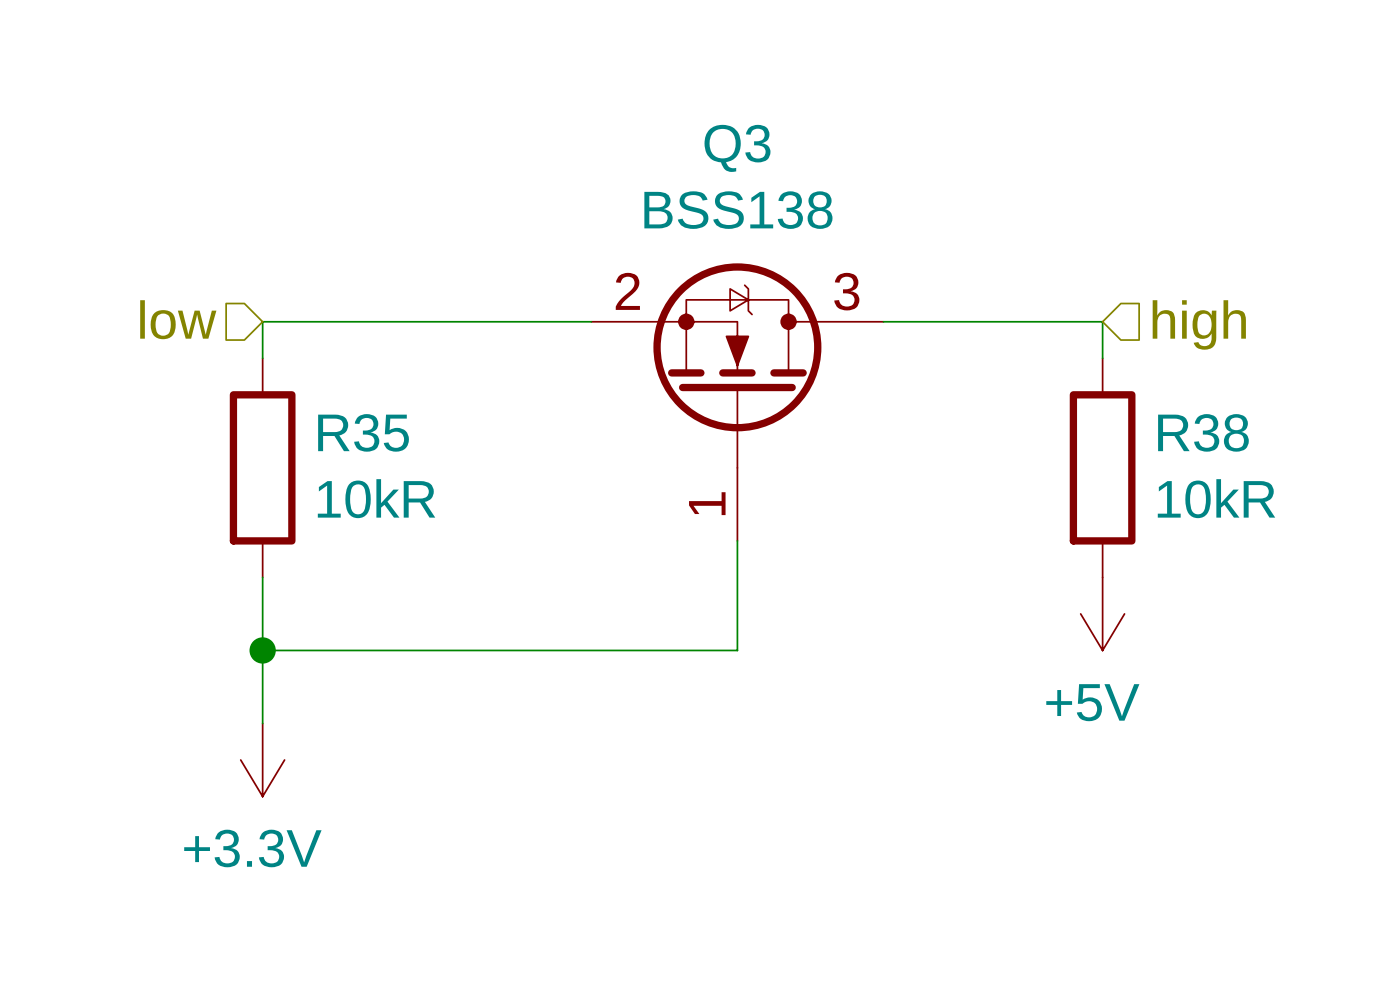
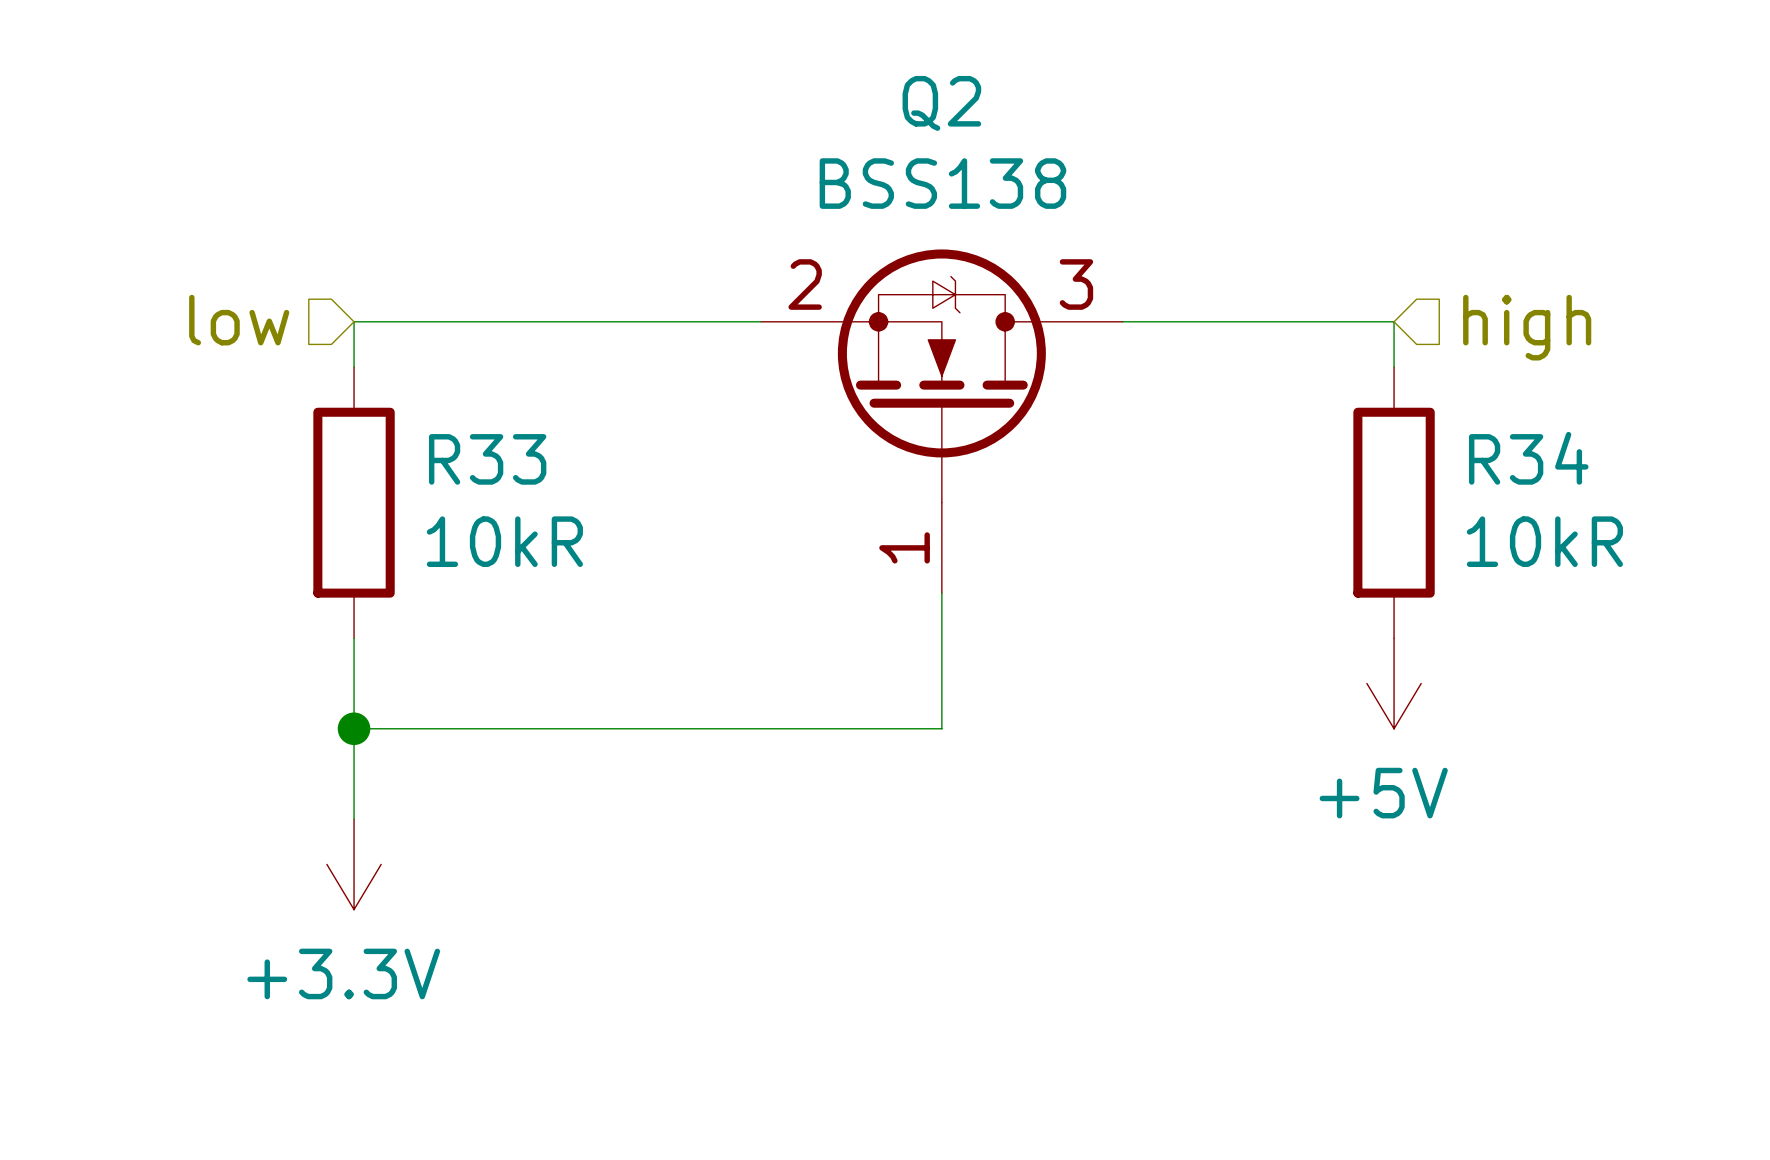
Q3 name: Q3 (737, 148) -> Q2 (941, 103)
R35 name: R35 (363, 432) -> R33 (487, 459)
R38 name: R38 (1203, 432) -> R34 (1528, 458)

